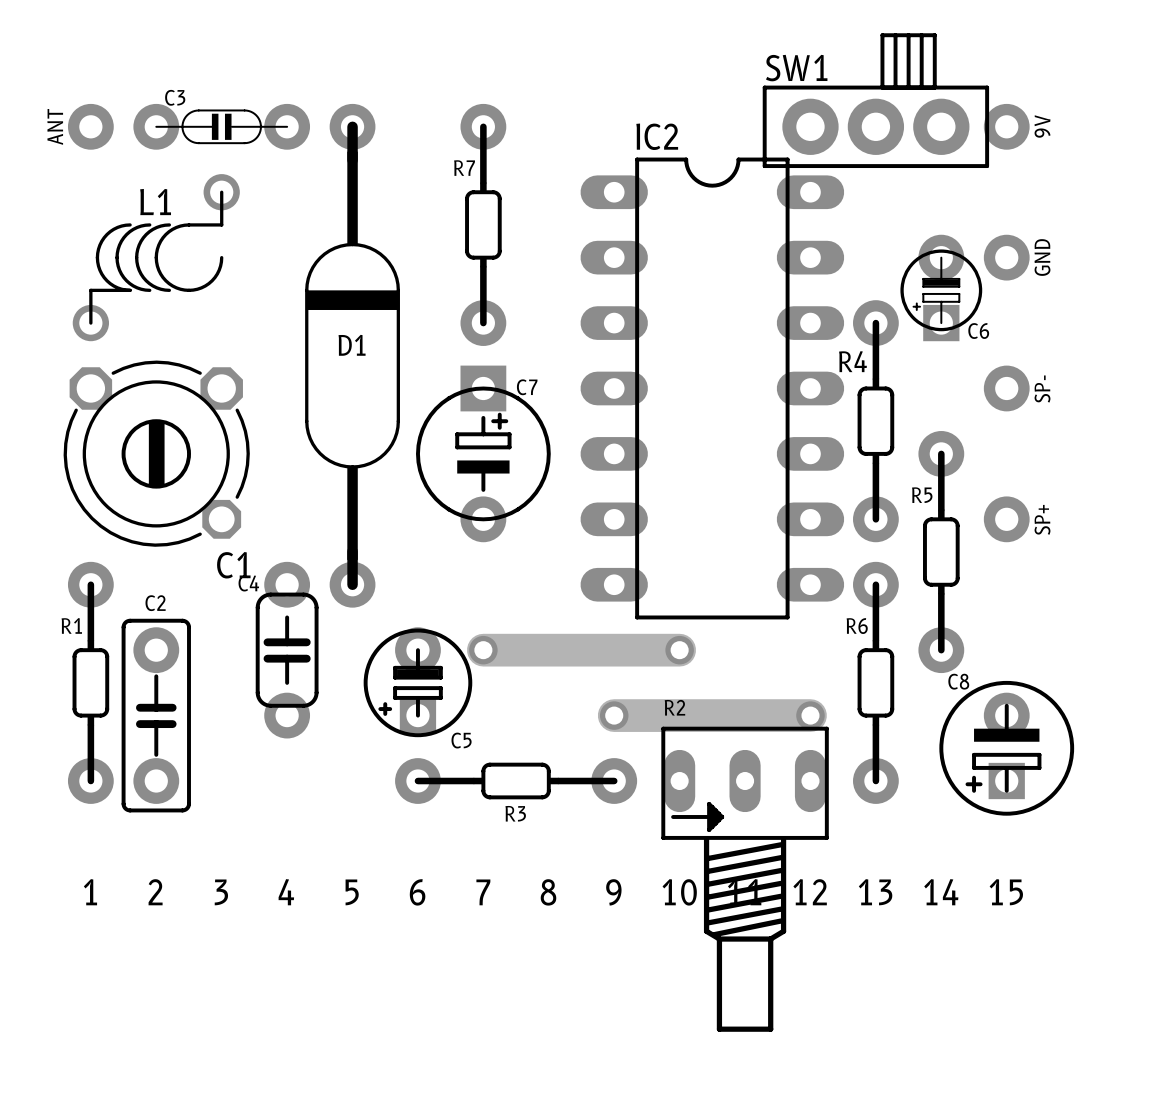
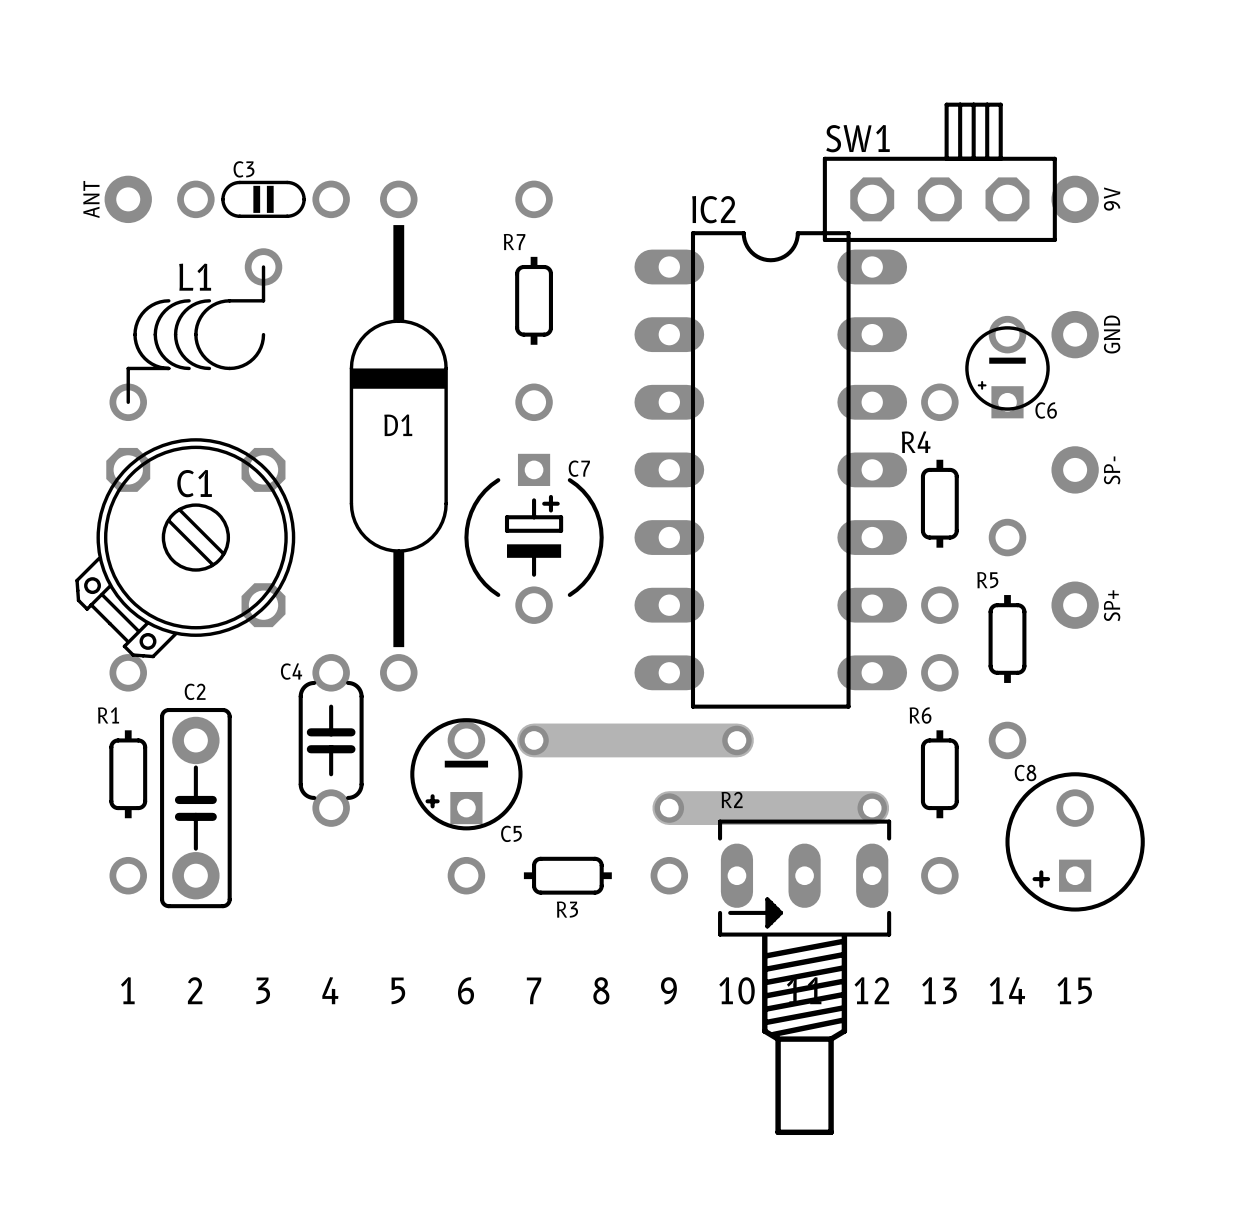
SW1 footprint: [762, 33, 990, 169] -> [822, 102, 1057, 242]
C3 footprint: [133, 103, 311, 150] -> [177, 180, 350, 219]
D1 footprint: [305, 103, 400, 608] -> [349, 180, 448, 692]
R7 footprint: [460, 103, 507, 346] -> [515, 180, 553, 422]
C6 footprint: [900, 234, 983, 342] -> [965, 315, 1050, 419]
R4 footprint: [853, 300, 899, 543] -> [920, 383, 959, 624]
C1 footprint: [63, 360, 250, 547] -> [75, 438, 296, 659]
C7 footprint: [416, 365, 551, 543] -> [464, 453, 604, 624]
R5 footprint: [918, 431, 965, 674] -> [988, 518, 1027, 760]
R1 footprint: [67, 561, 114, 804] -> [109, 654, 148, 895]
C4 footprint: [255, 561, 319, 739] -> [298, 654, 364, 827]
R6 footprint: [853, 561, 899, 804] -> [920, 654, 959, 895]
C1 name position: C1 (233, 565) -> C1 (194, 483)
C5 footprint: [363, 627, 473, 738] -> [410, 718, 523, 831]
C8 footprint: [939, 680, 1075, 816] -> [1005, 772, 1145, 912]
R2 footprint: [661, 726, 829, 1032] -> [718, 819, 892, 1136]
R3 footprint: [395, 758, 638, 804] -> [447, 856, 689, 895]

